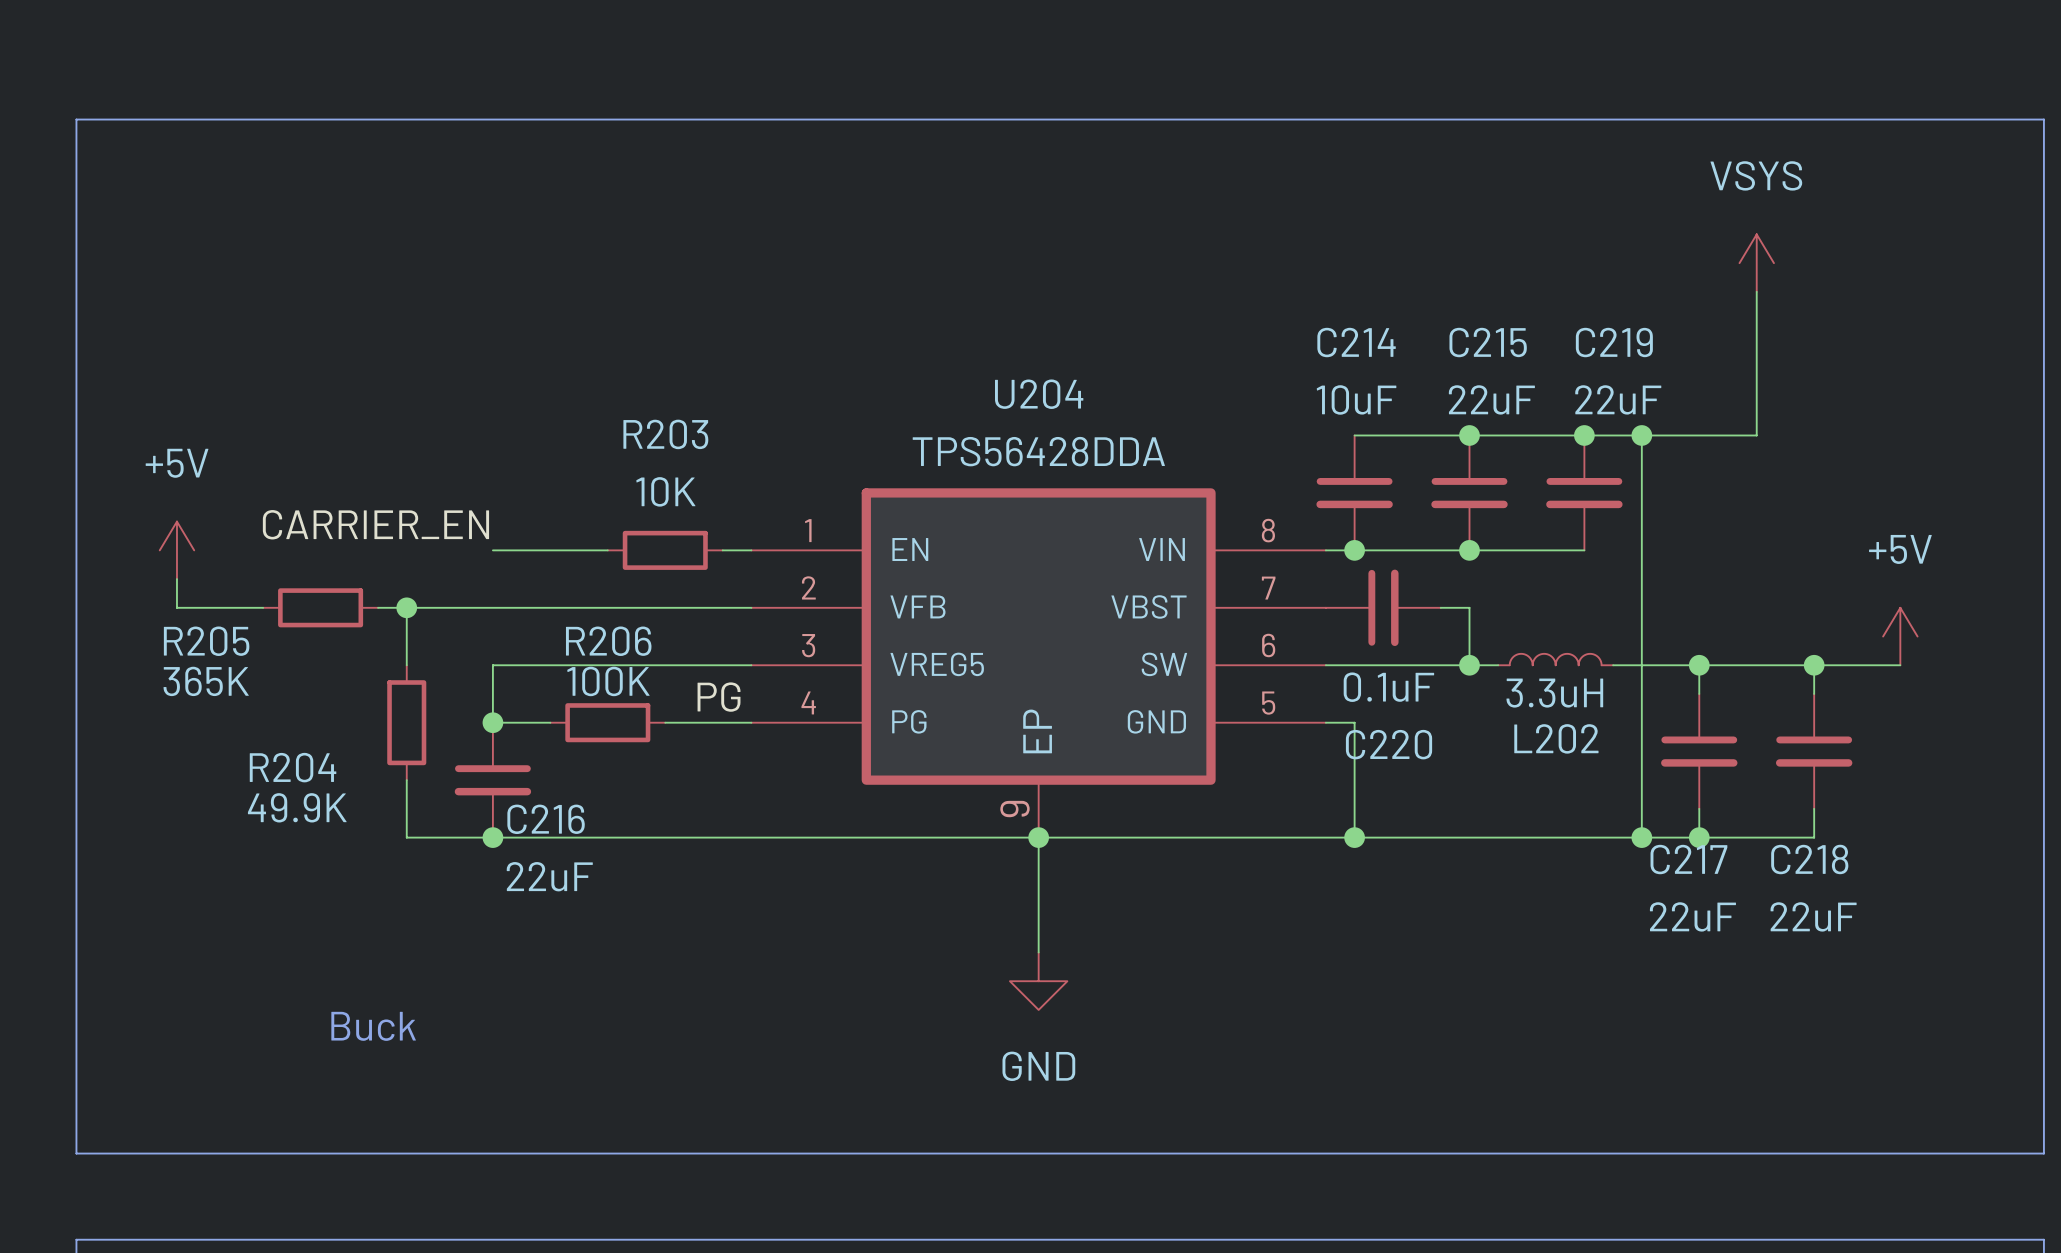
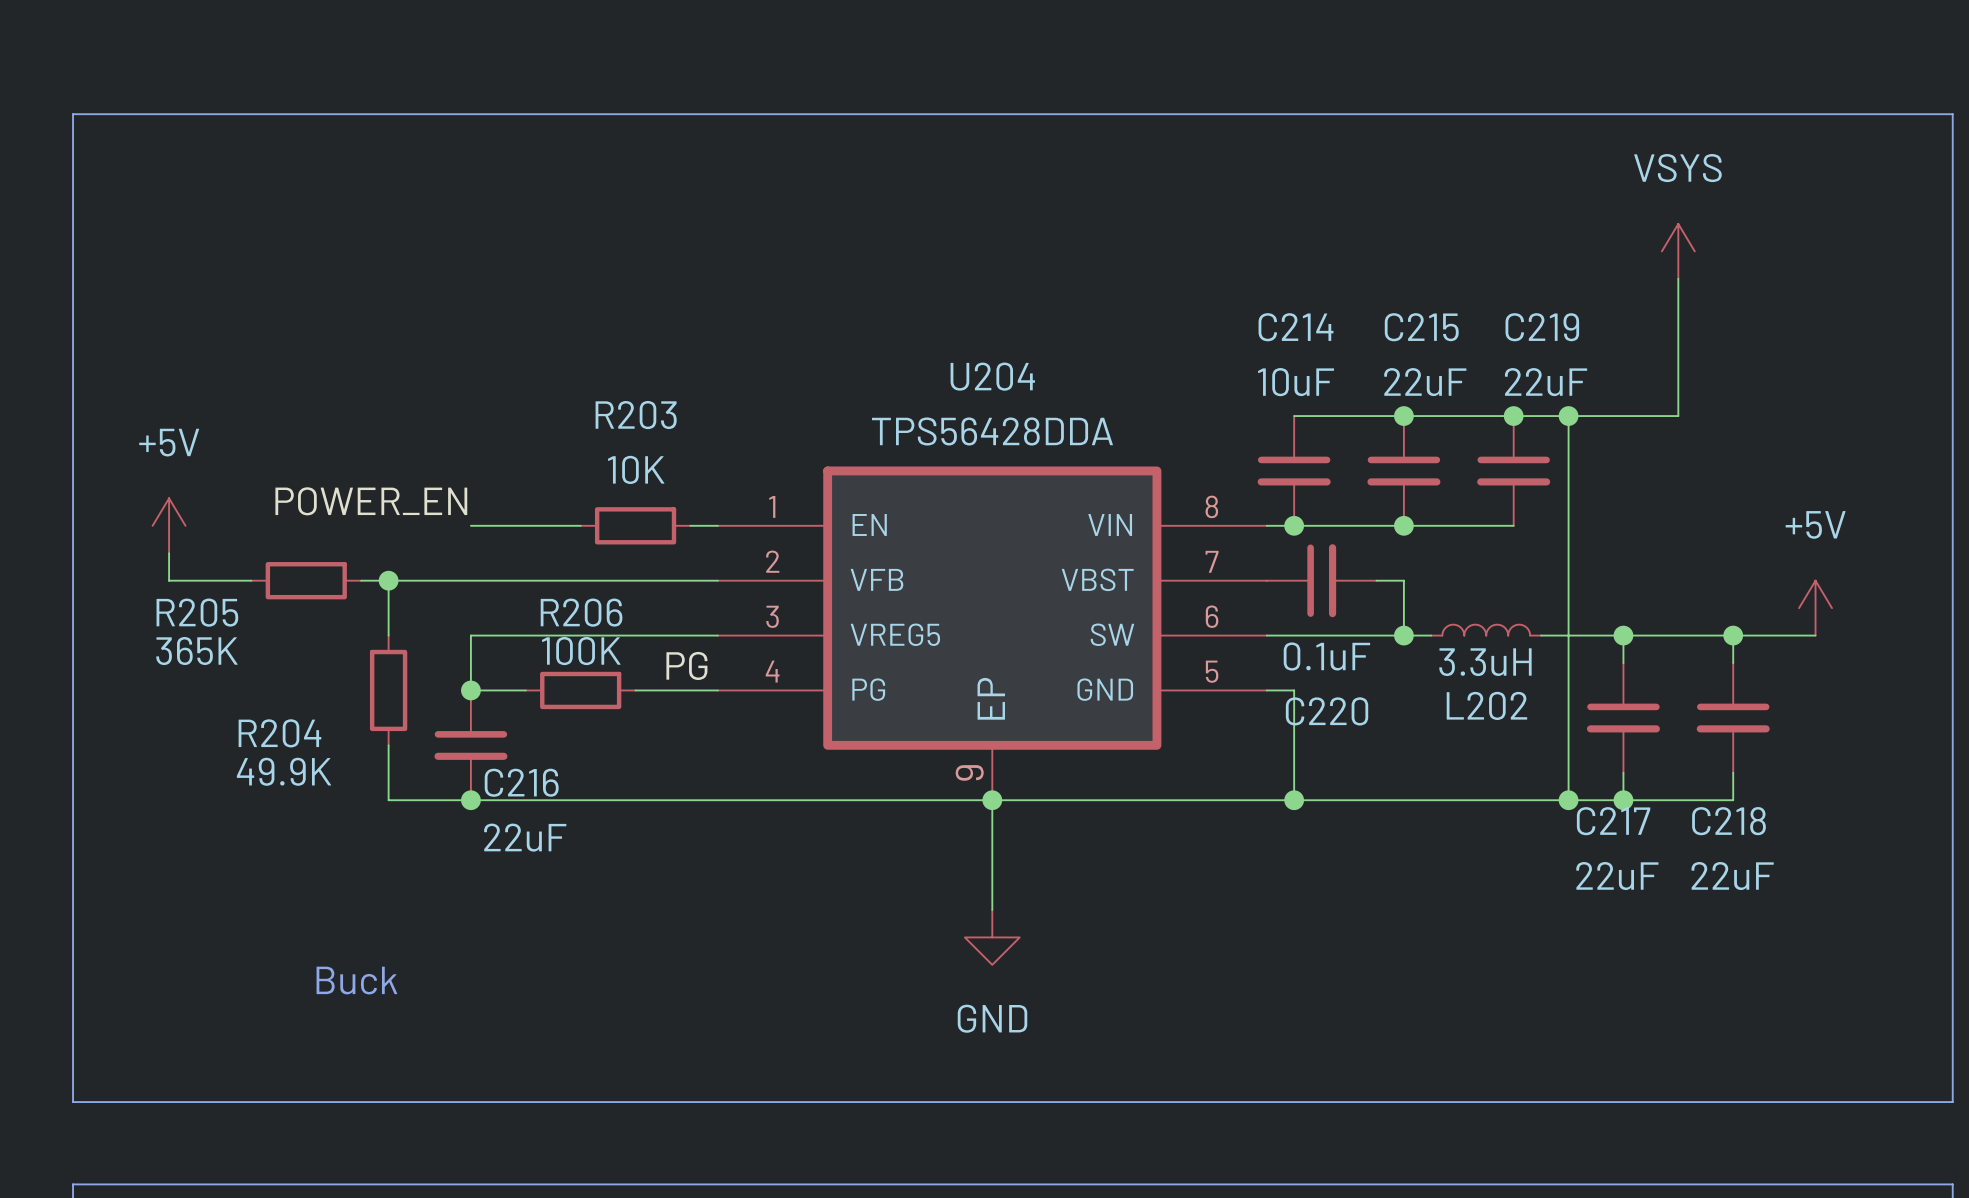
label: CARRIER_EN (375, 524) -> POWER_EN (371, 501)

